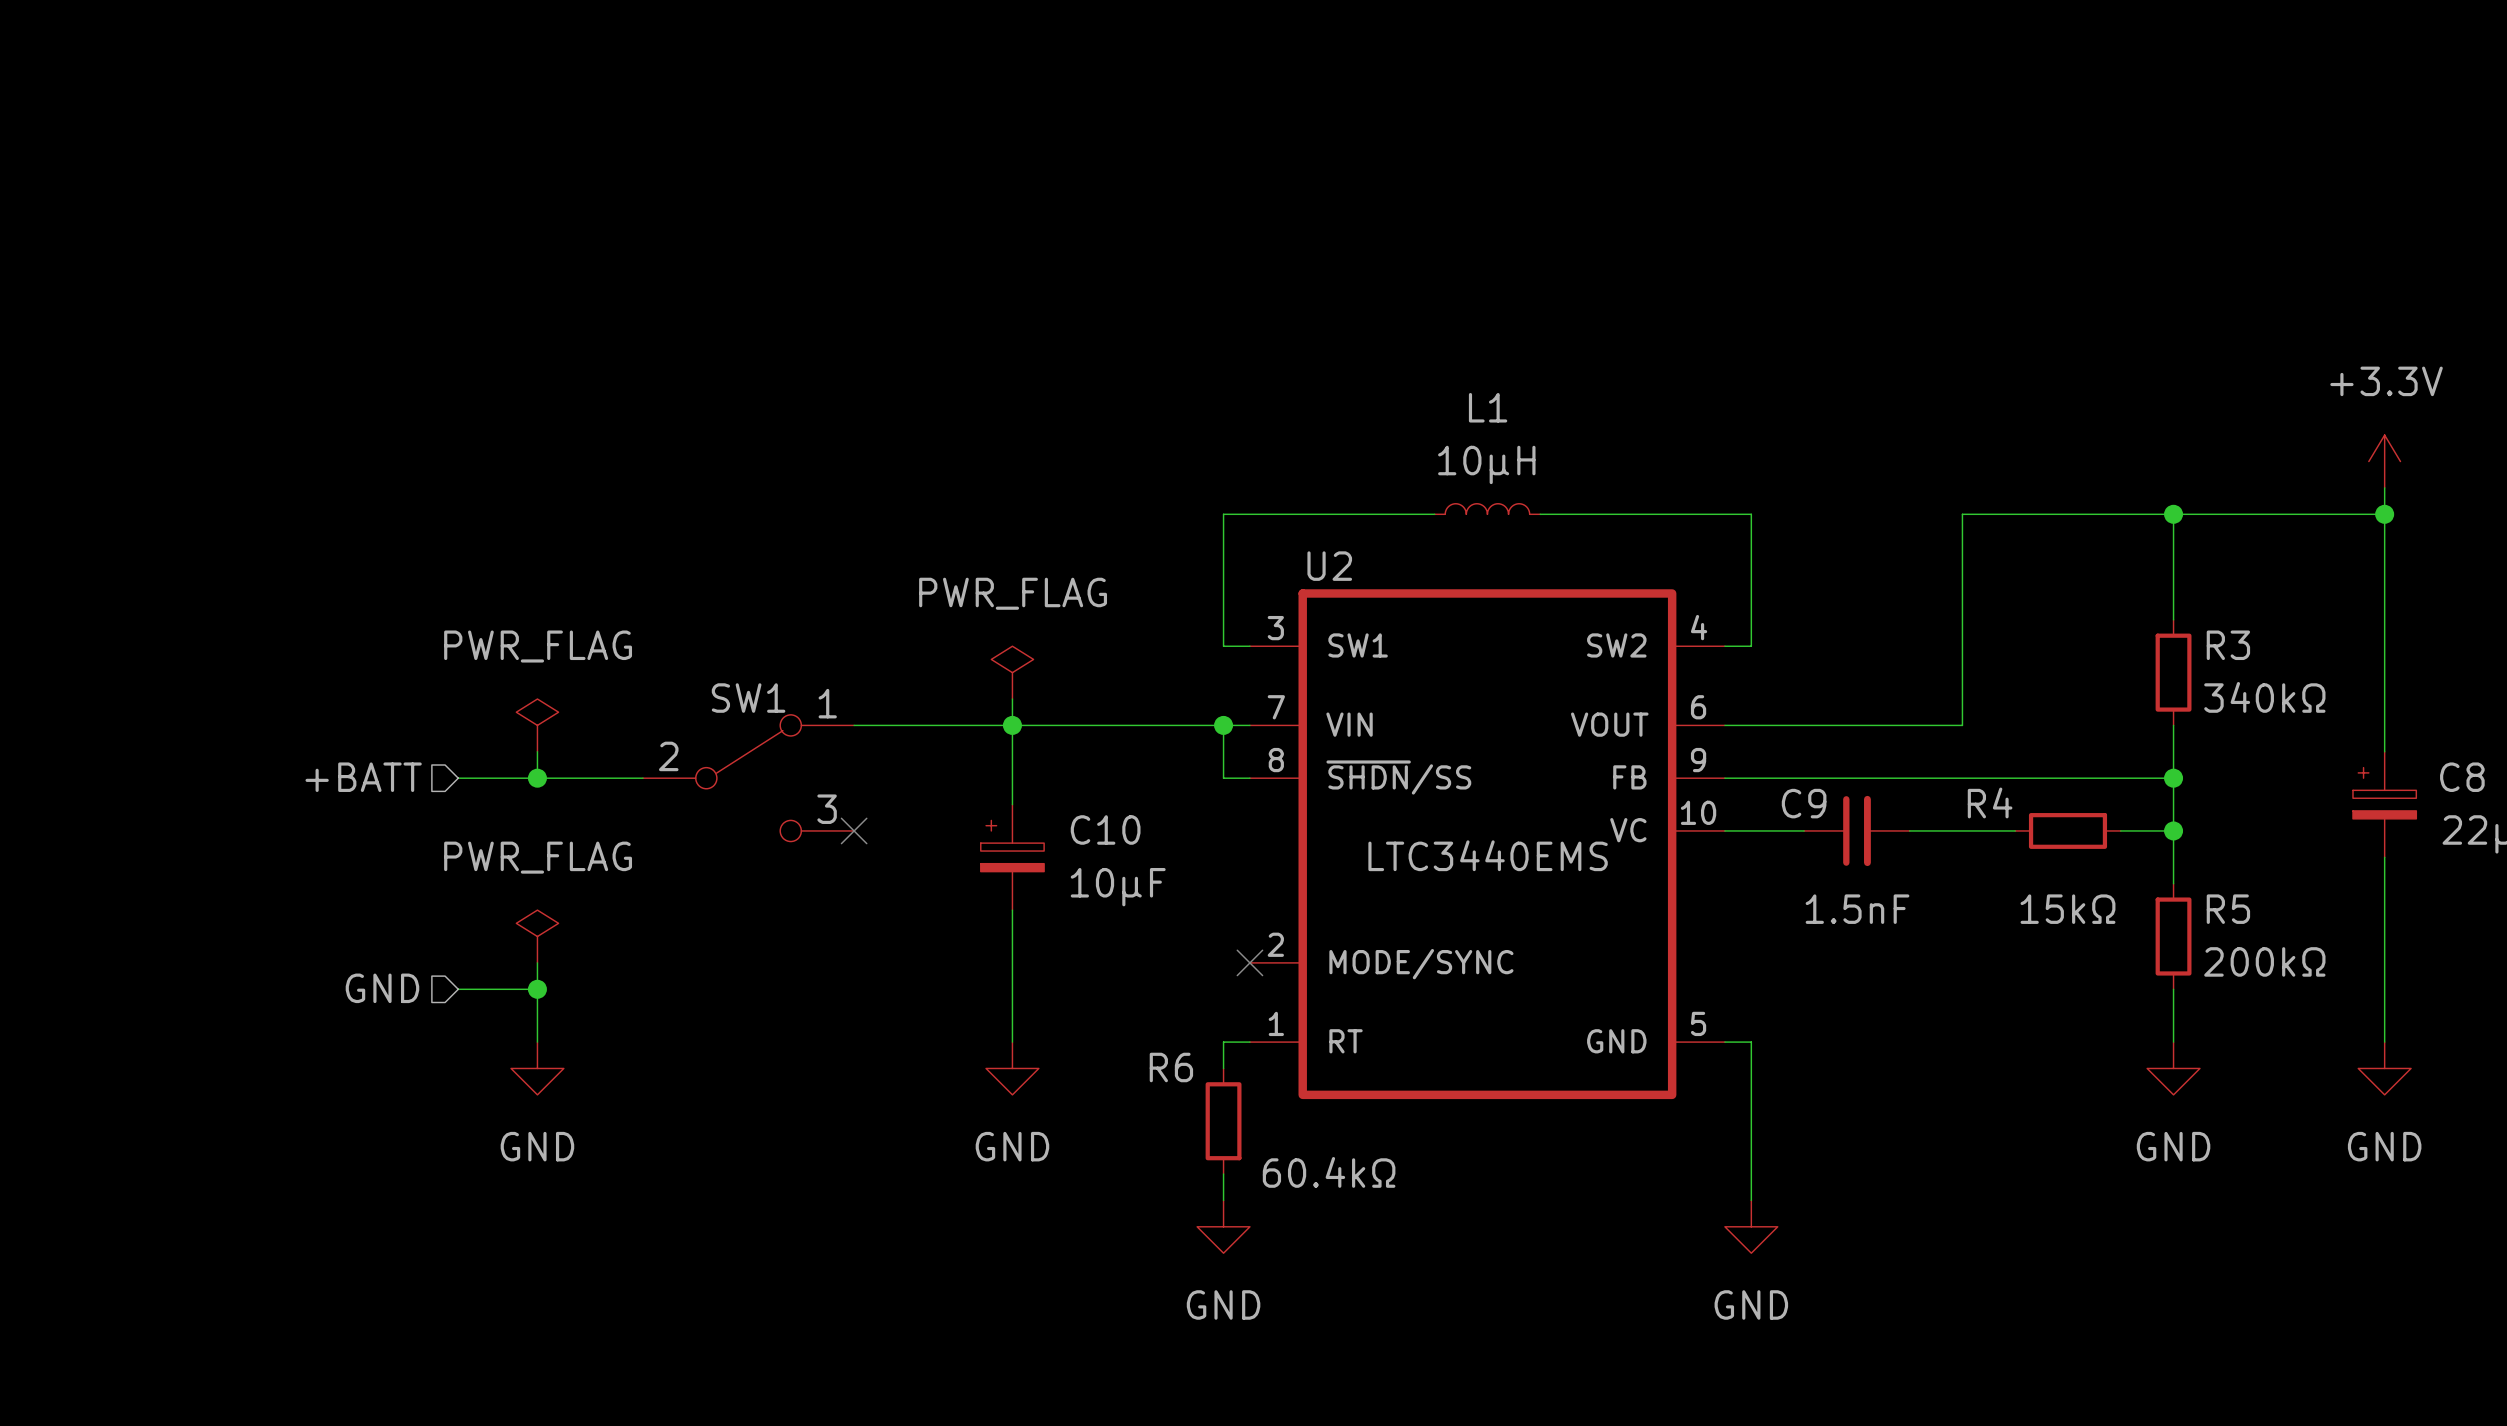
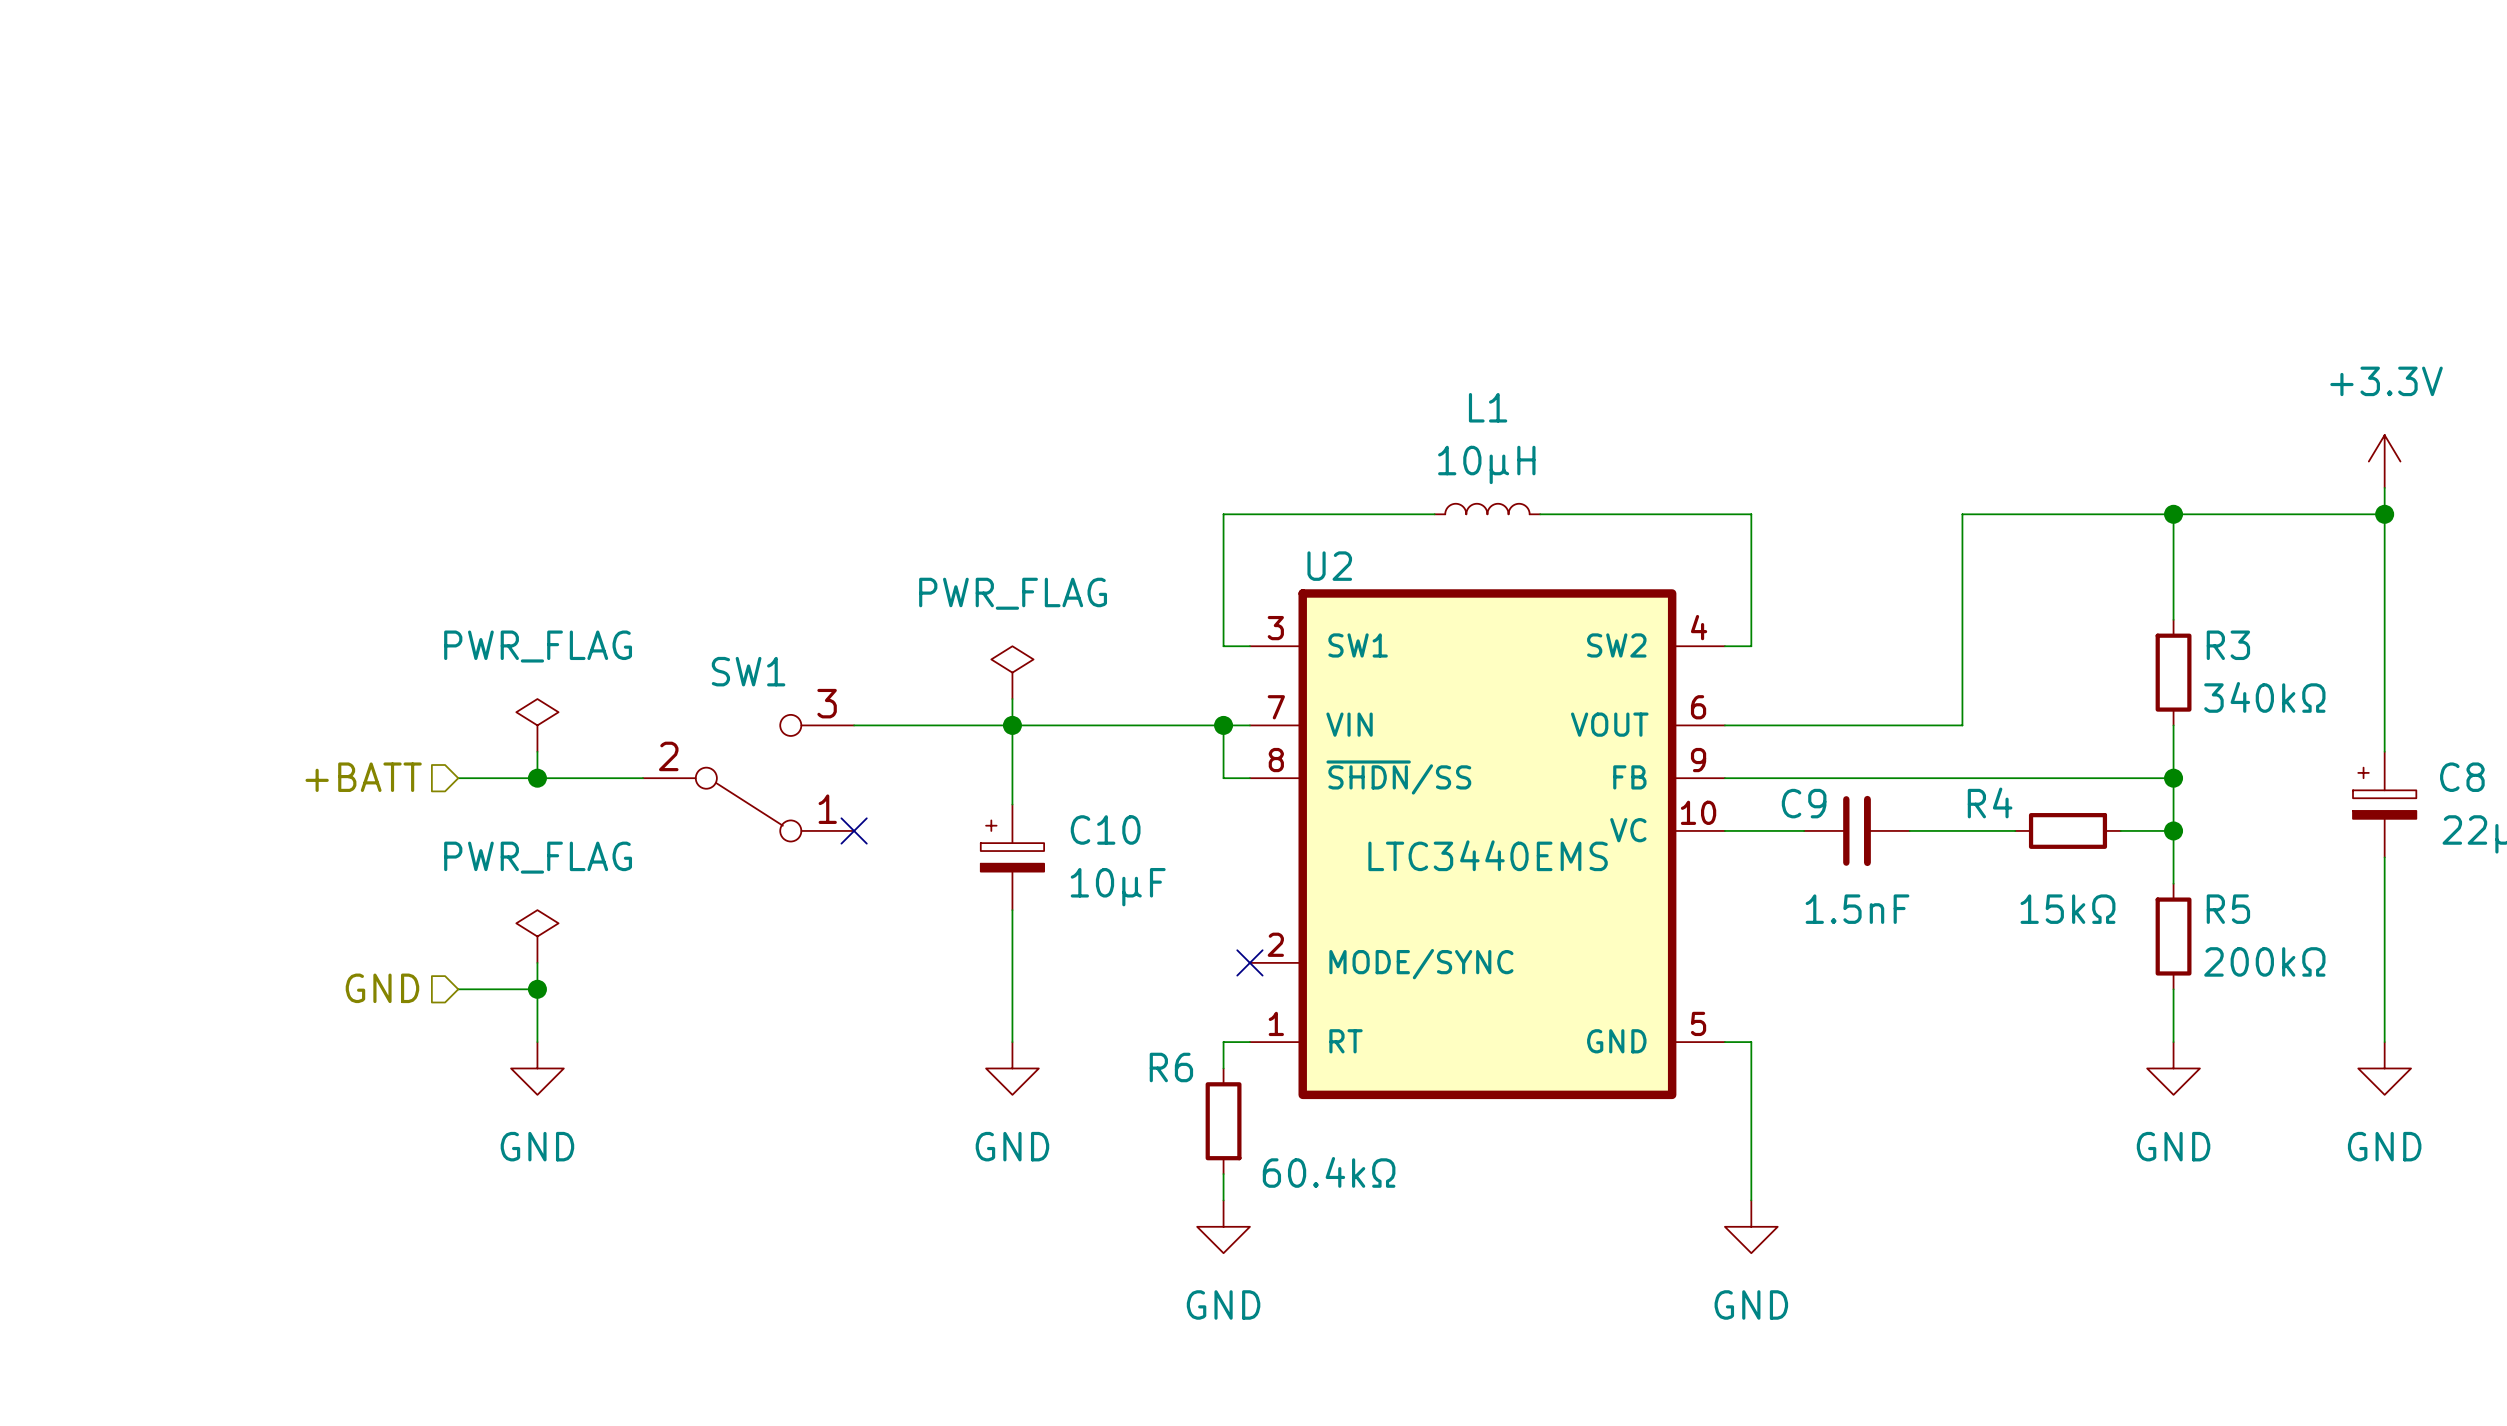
SW1 flip: as is (748, 778) -> up-down (748, 778)

